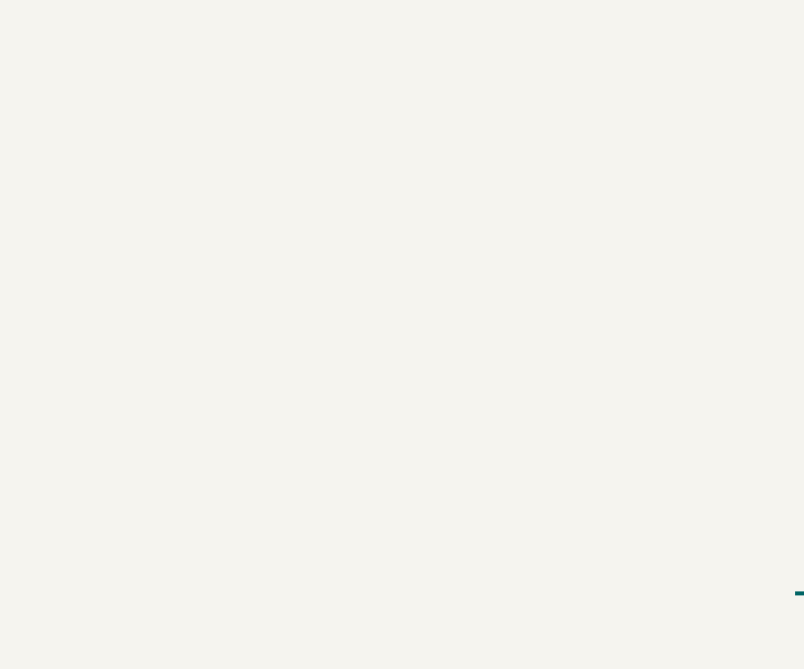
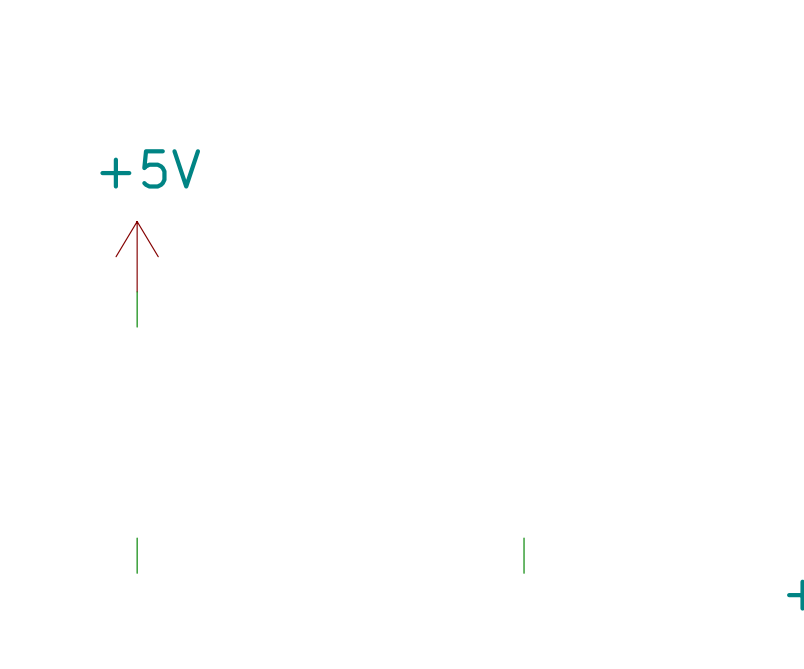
power symbol: none -> +5V (137, 256)
wire: none -> (137, 291) (137, 327)
wire: none -> (137, 538) (137, 573)
wire: none -> (524, 538) (524, 573)

